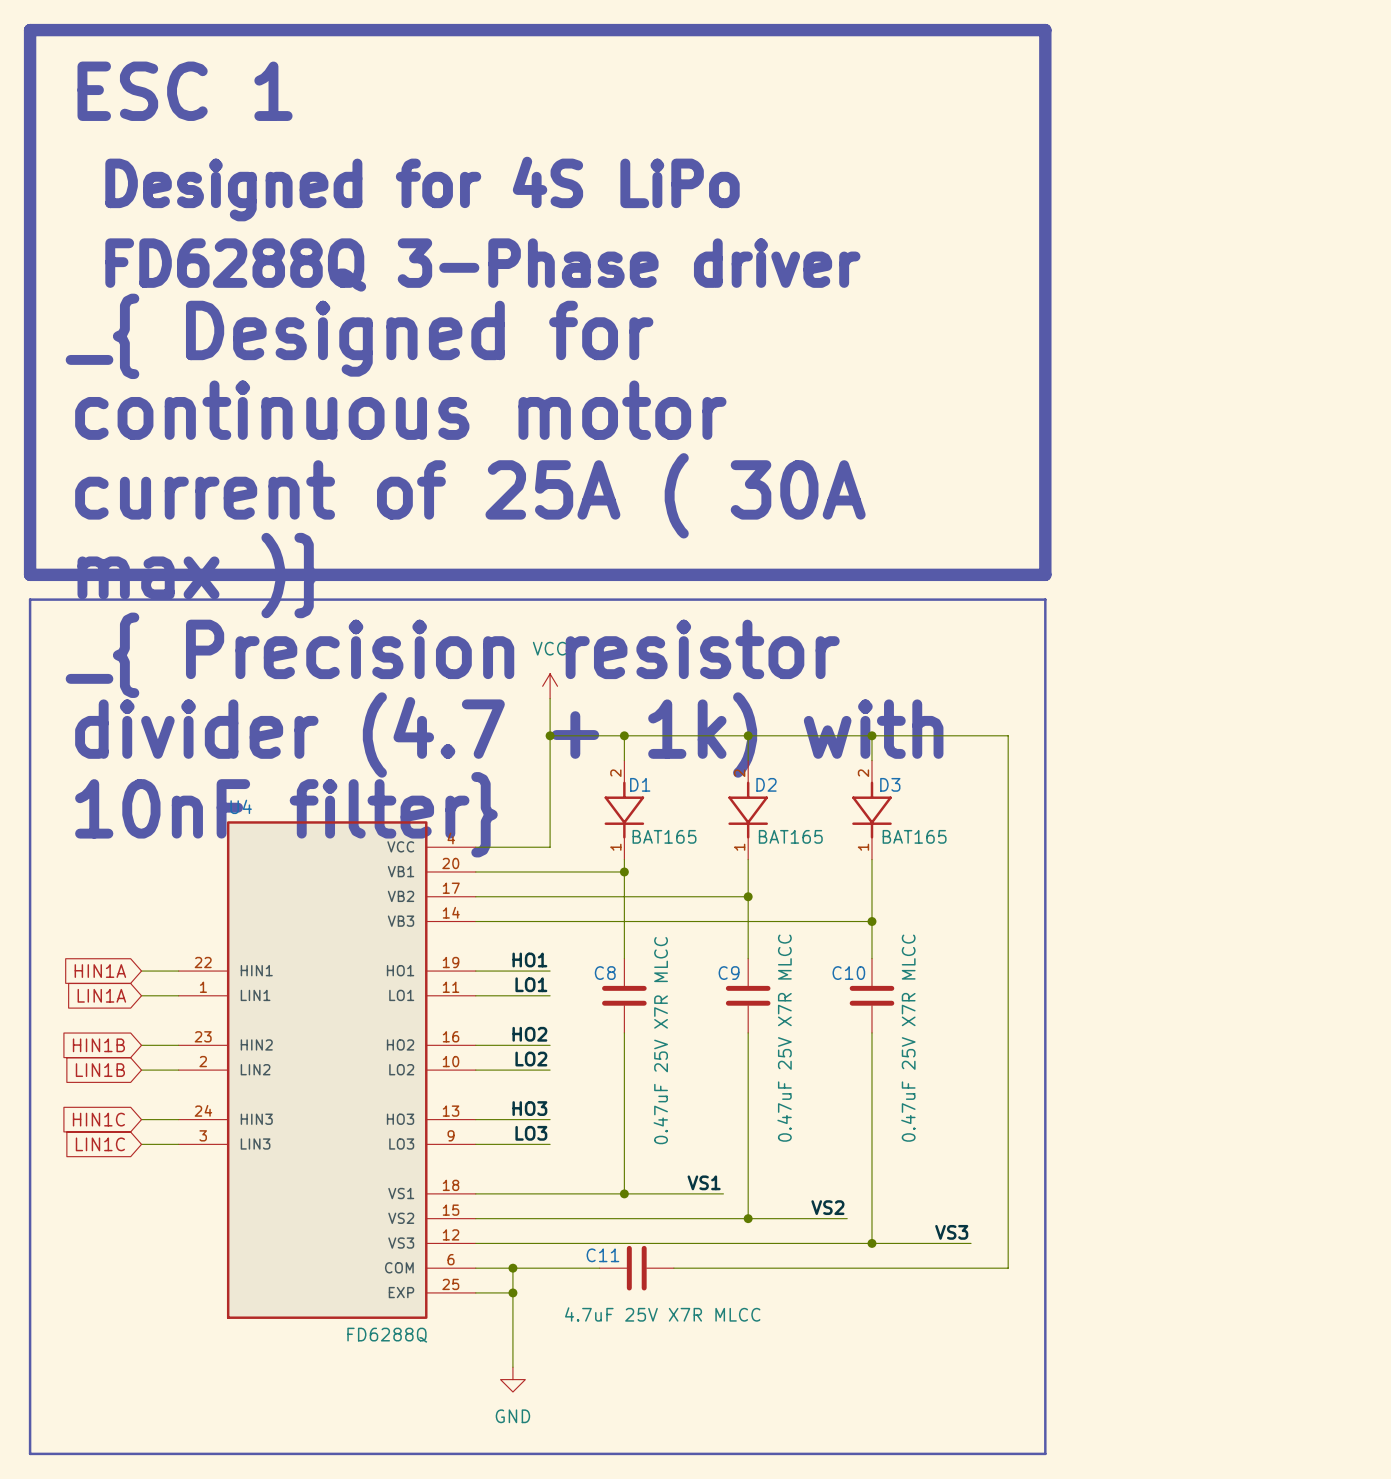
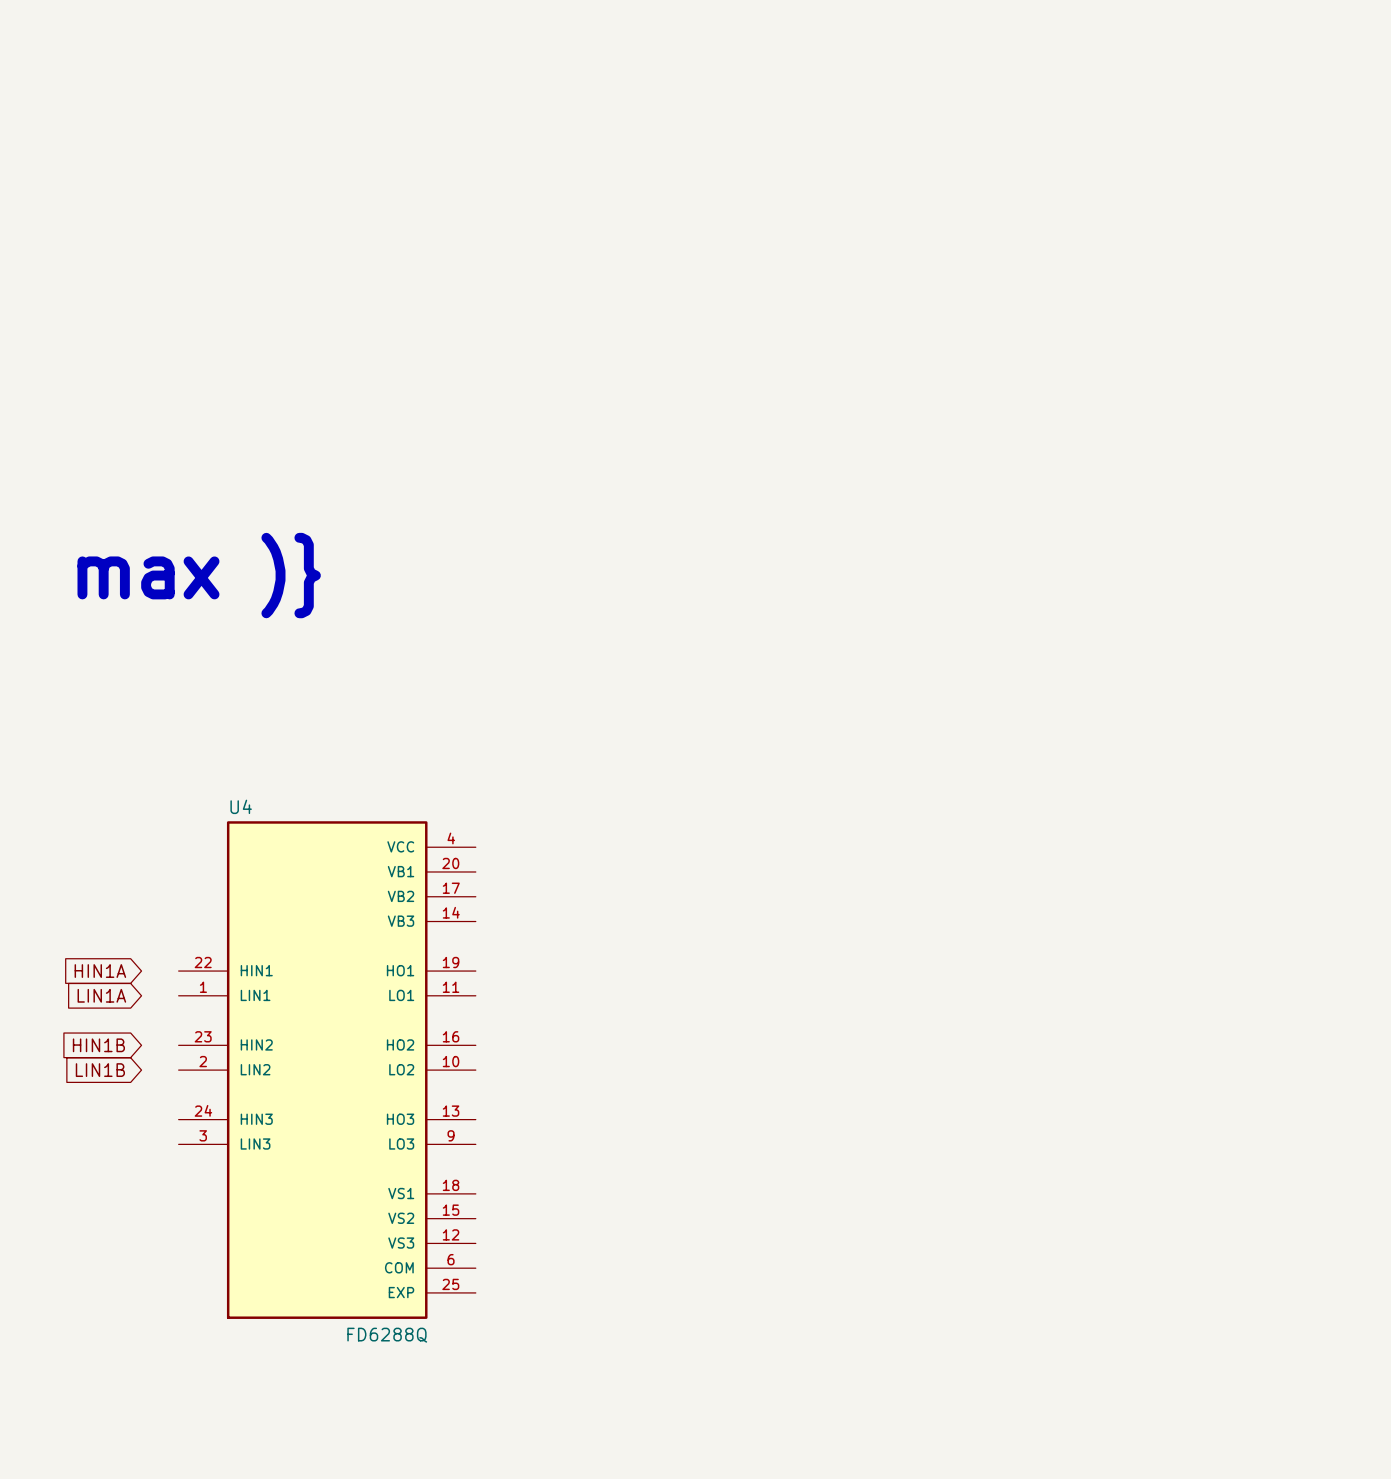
line: (30, 30) (1045, 30) (1045, 574) (30, 574) (30, 30) -> none
text: ESC 1 (185, 91) -> none
text: Designed for 4S LiPo (422, 189) -> none
text: FD6288Q 3-Phase driver (482, 264) -> none
text: _{ Designed for (359, 336) -> none
text: continuous motor (400, 410) -> none
text: current of 25A ( 30A (470, 495) -> none
line: (30, 599) (1045, 599) (1045, 1453) (30, 1453) (30, 599) -> none
text: _{ Precision resistor (452, 655) -> none
power symbol: VCC (550, 686) -> none
wire: (550, 698) (550, 847) (475, 847) -> none
text: divider (4.7 + 1k) with (509, 735) -> none
wire: (550, 735) (1008, 735) (1008, 1268) (673, 1268) -> none
junction: (550, 735) -> none
wire: (624, 735) (624, 760) -> none
junction: (624, 735) -> none
wire: (748, 735) (748, 760) -> none
junction: (748, 735) -> none
wire: (871, 735) (871, 760) -> none
junction: (871, 735) -> none
D1: BAT165 (624, 810) -> none
D2: BAT165 (748, 810) -> none
D3: BAT165 (871, 810) -> none
text: 10nF filter} (286, 814) -> none
wire: (624, 859) (624, 958) -> none
wire: (748, 859) (748, 958) -> none
wire: (871, 859) (871, 958) -> none
wire: (475, 871) (624, 871) -> none
junction: (624, 871) -> none
wire: (475, 896) (748, 896) -> none
junction: (748, 896) -> none
wire: (475, 921) (871, 921) -> none
junction: (871, 921) -> none
label: HO1 (529, 959) -> none
wire: (141, 971) (178, 971) -> none
wire: (475, 971) (550, 971) -> none
label: LO1 (531, 984) -> none
wire: (141, 995) (178, 995) -> none
wire: (475, 995) (550, 995) -> none
C8: 0.47uF 25V X7R MLCC (624, 995) -> none
C9: 0.47uF 25V X7R MLCC (748, 995) -> none
C10: 0.47uF 25V X7R MLCC (871, 995) -> none
wire: (624, 1032) (624, 1193) -> none
wire: (748, 1032) (748, 1218) -> none
wire: (871, 1032) (871, 1243) -> none
label: HO2 (529, 1034) -> none
wire: (141, 1045) (178, 1045) -> none
wire: (475, 1045) (550, 1045) -> none
label: LO2 (531, 1059) -> none
wire: (141, 1070) (178, 1070) -> none
wire: (475, 1070) (550, 1070) -> none
label: HO3 (529, 1108) -> none
global label: HIN1C (98, 1119) -> none
wire: (141, 1119) (178, 1119) -> none
wire: (475, 1119) (550, 1119) -> none
label: LO3 (531, 1133) -> none
global label: LIN1C (100, 1144) -> none
wire: (141, 1144) (178, 1144) -> none
wire: (475, 1144) (550, 1144) -> none
label: VS1 (704, 1182) -> none
wire: (475, 1193) (723, 1193) -> none
junction: (624, 1193) -> none
label: VS2 (827, 1207) -> none
wire: (475, 1218) (847, 1218) -> none
junction: (748, 1218) -> none
label: VS3 (951, 1232) -> none
wire: (475, 1243) (971, 1243) -> none
junction: (871, 1243) -> none
wire: (475, 1268) (599, 1268) -> none
wire: (512, 1268) (512, 1367) -> none
junction: (512, 1268) -> none
C11: 4.7uF 25V X7R MLCC (636, 1268) -> none
wire: (475, 1292) (512, 1292) -> none
junction: (512, 1292) -> none
power symbol: GND (512, 1379) -> none

